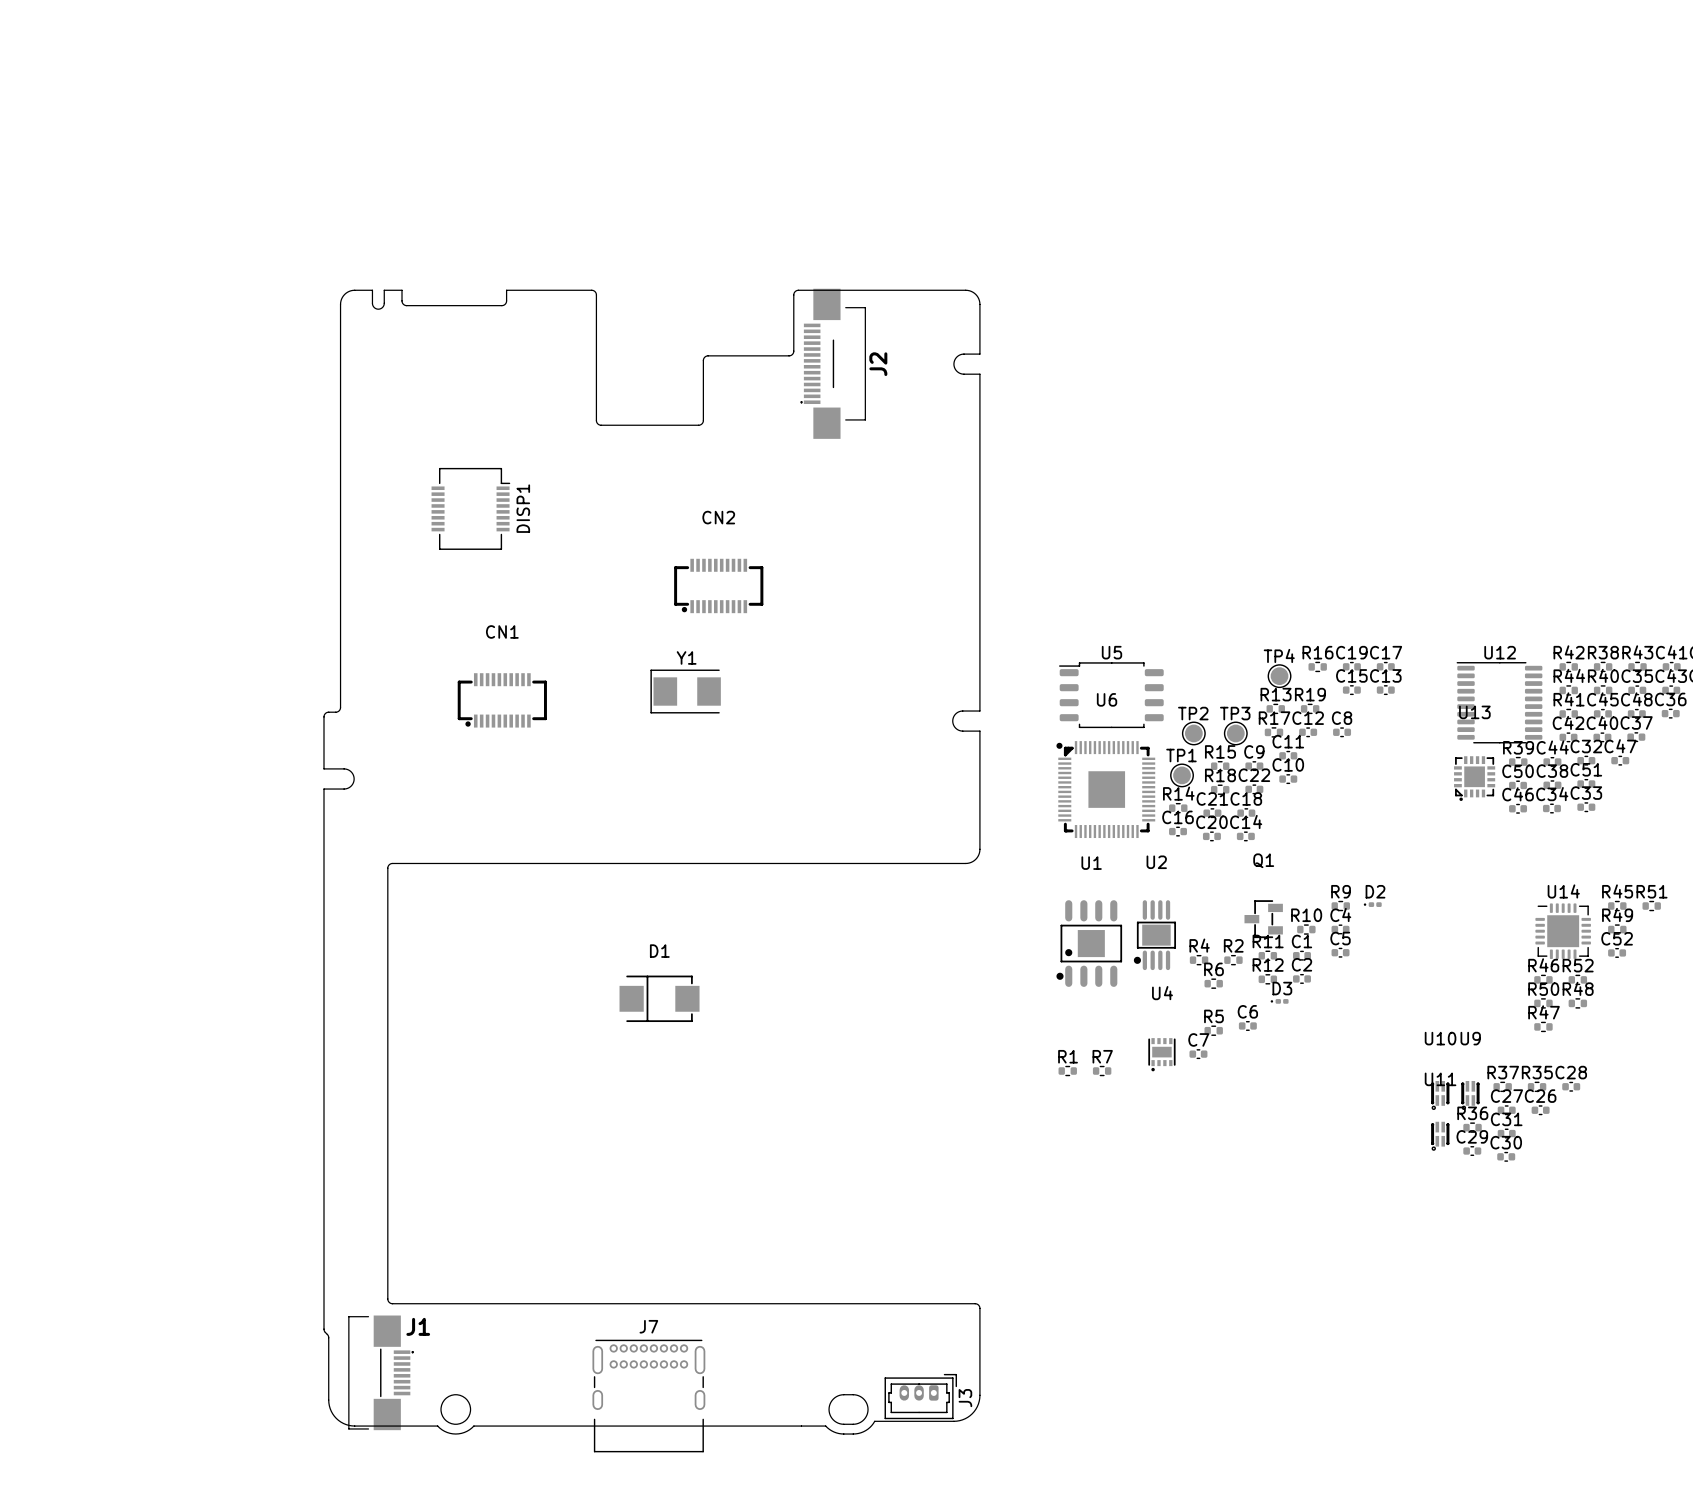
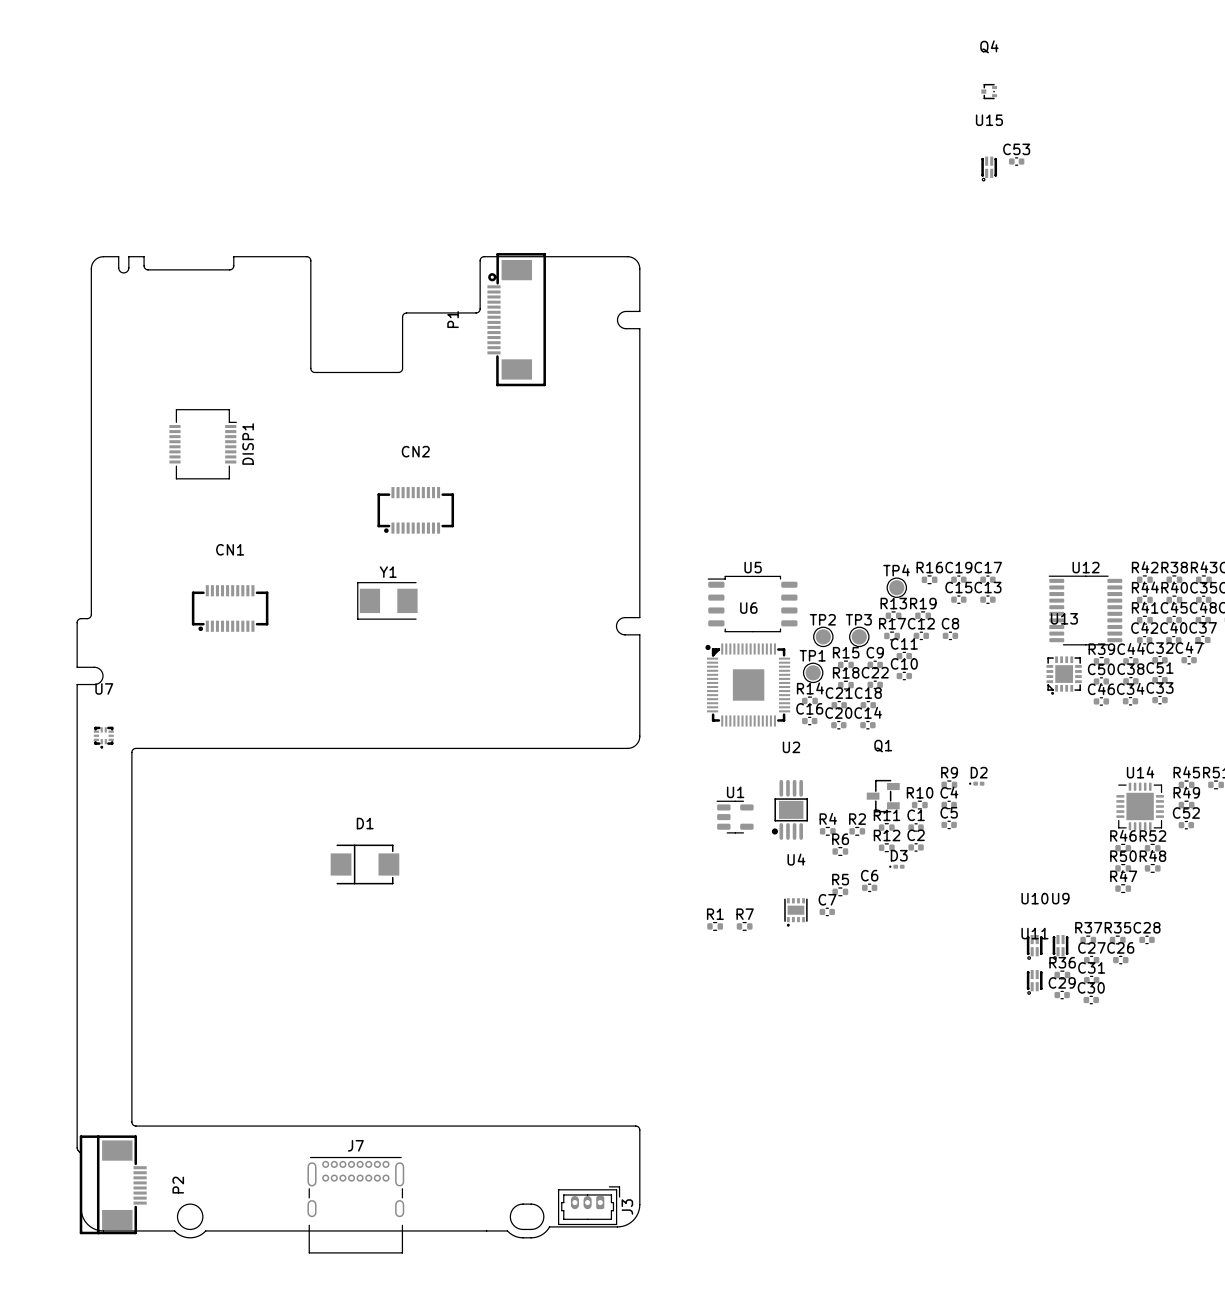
Q4: none -> (989, 91)
C53: none -> (1016, 161)
U15: none -> (989, 169)
J2: (833, 363) -> none
P1: none -> (516, 319)
U7: none -> (103, 737)
U1 name position: U1 (1091, 863) -> U1 (735, 792)
U1 footprint: [1056, 900, 1123, 987] -> [716, 800, 754, 834]
P2: none -> (113, 1184)
J1: (381, 1372) -> none

